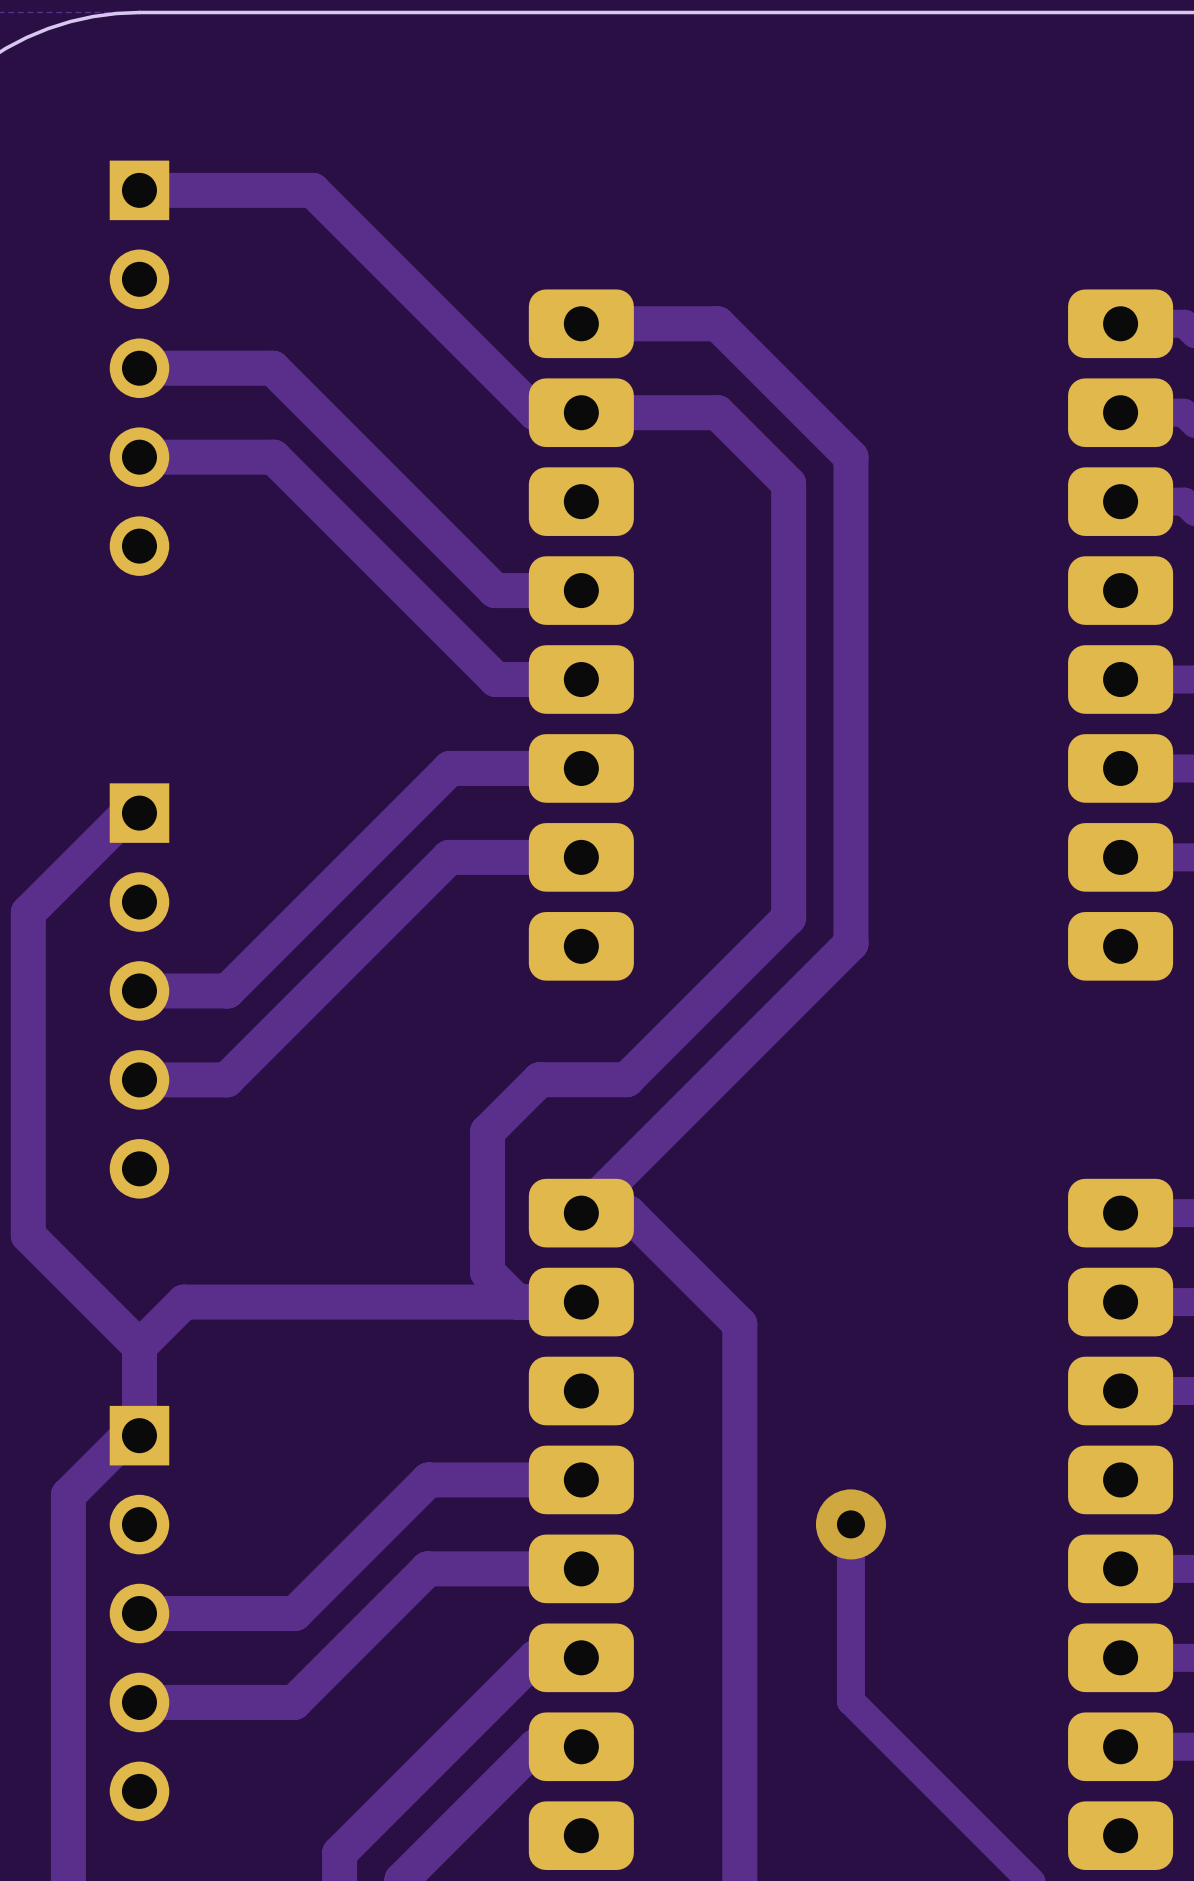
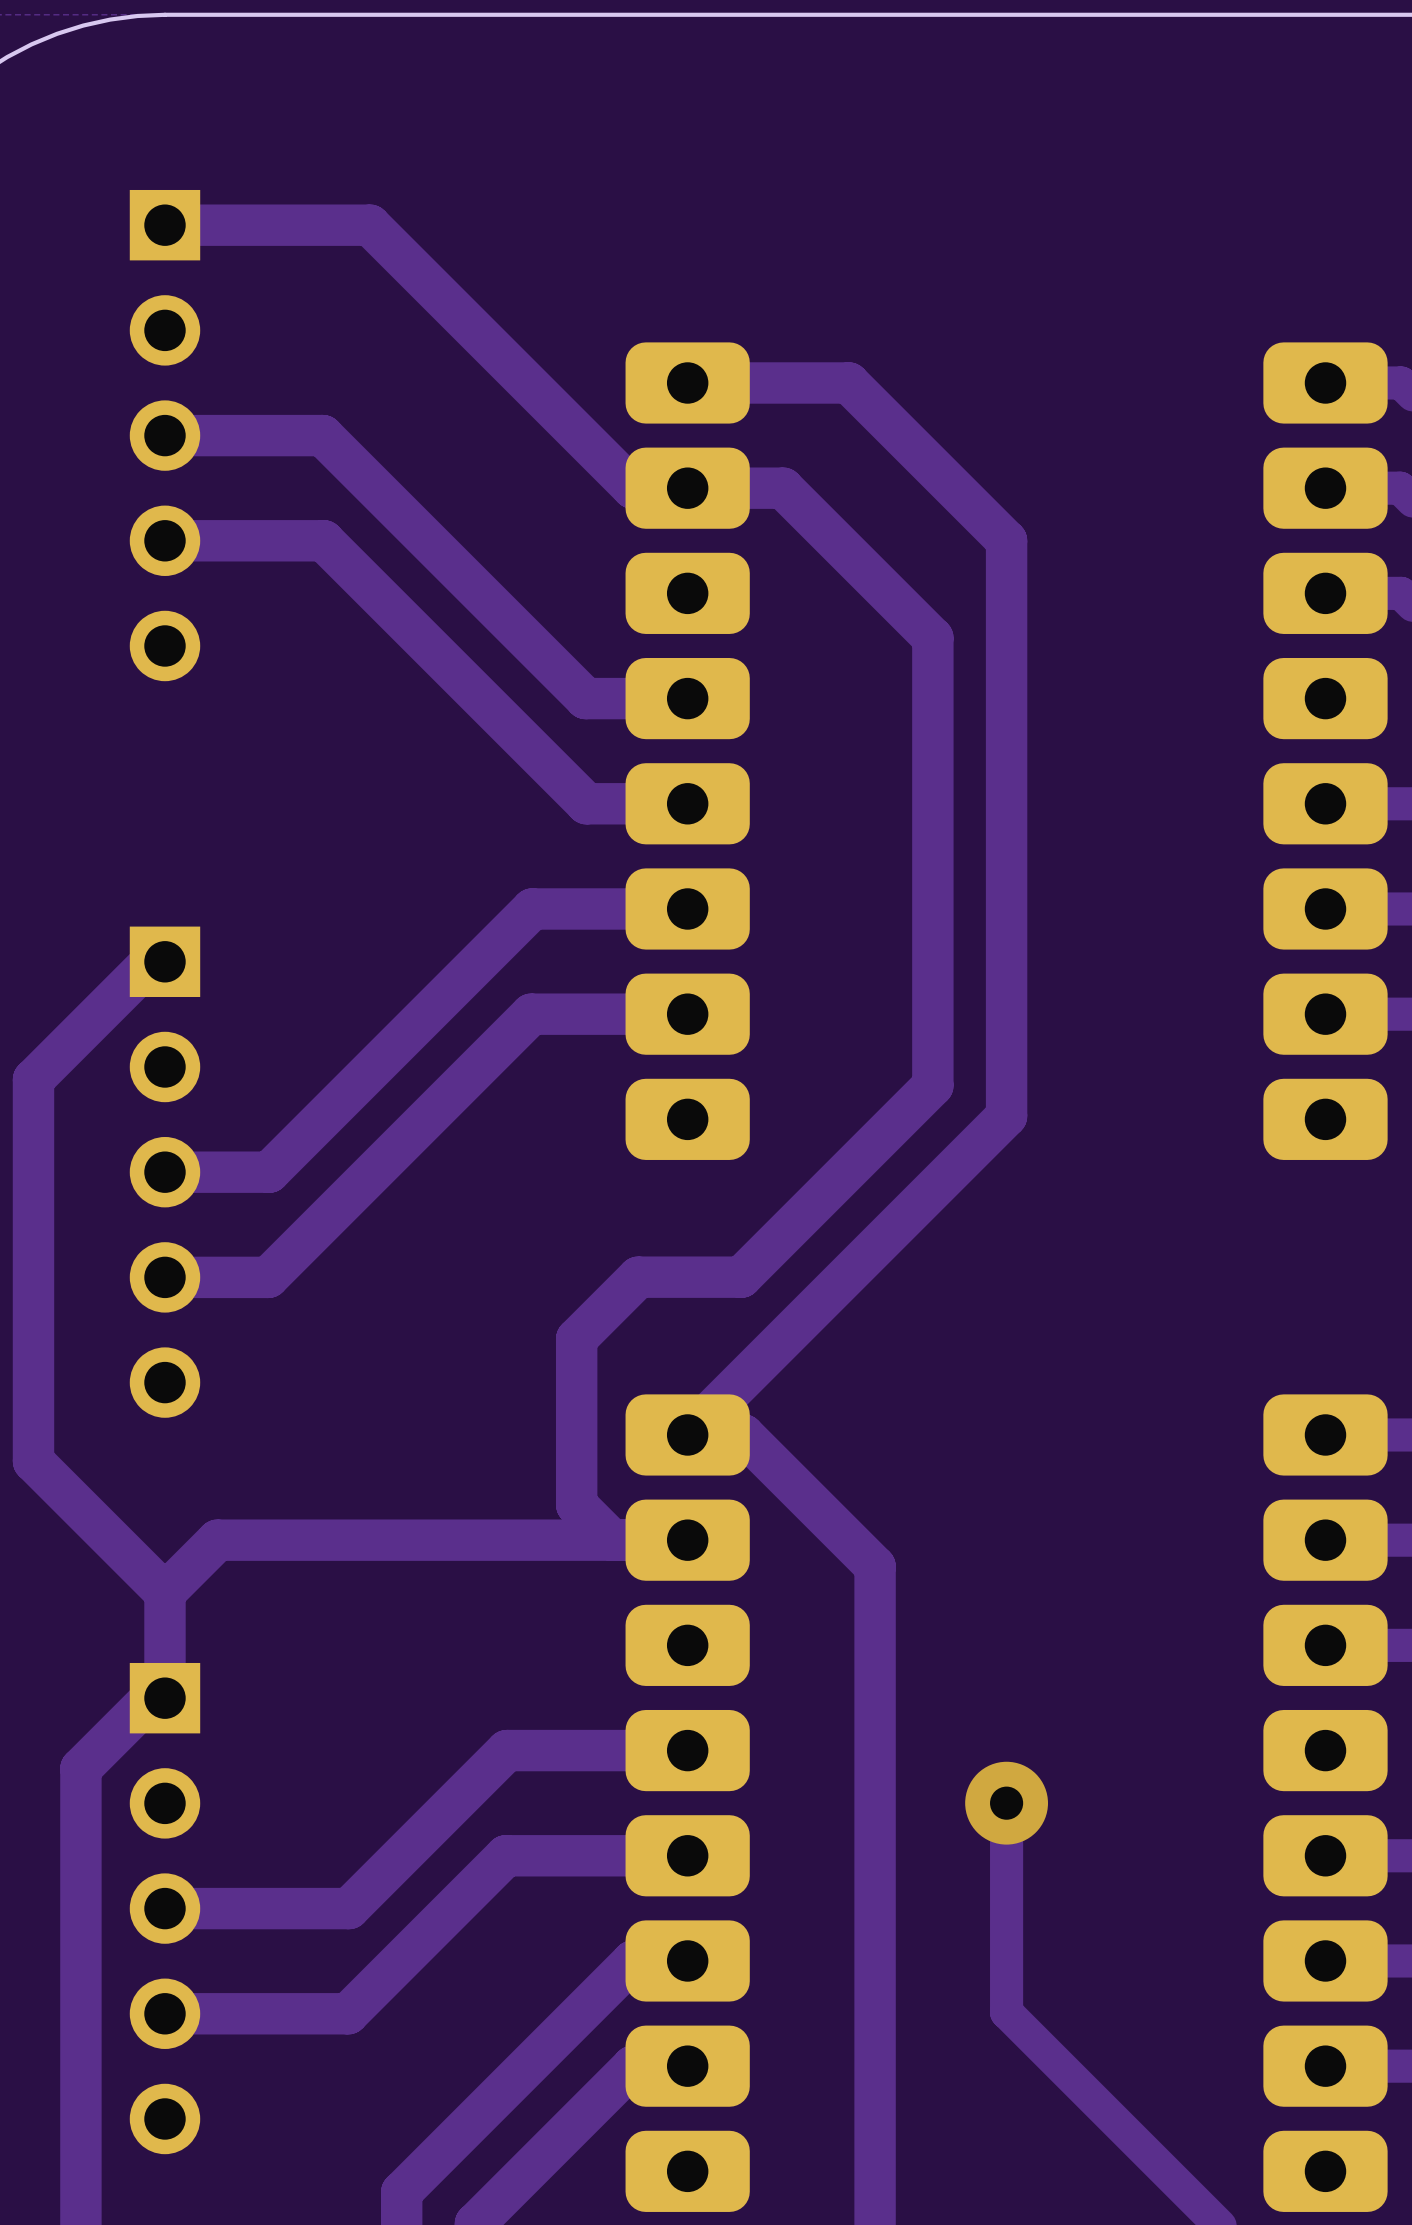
track: (661, 412) (717, 412) (788, 483) (788, 539) -> (783, 488) (932, 638)

